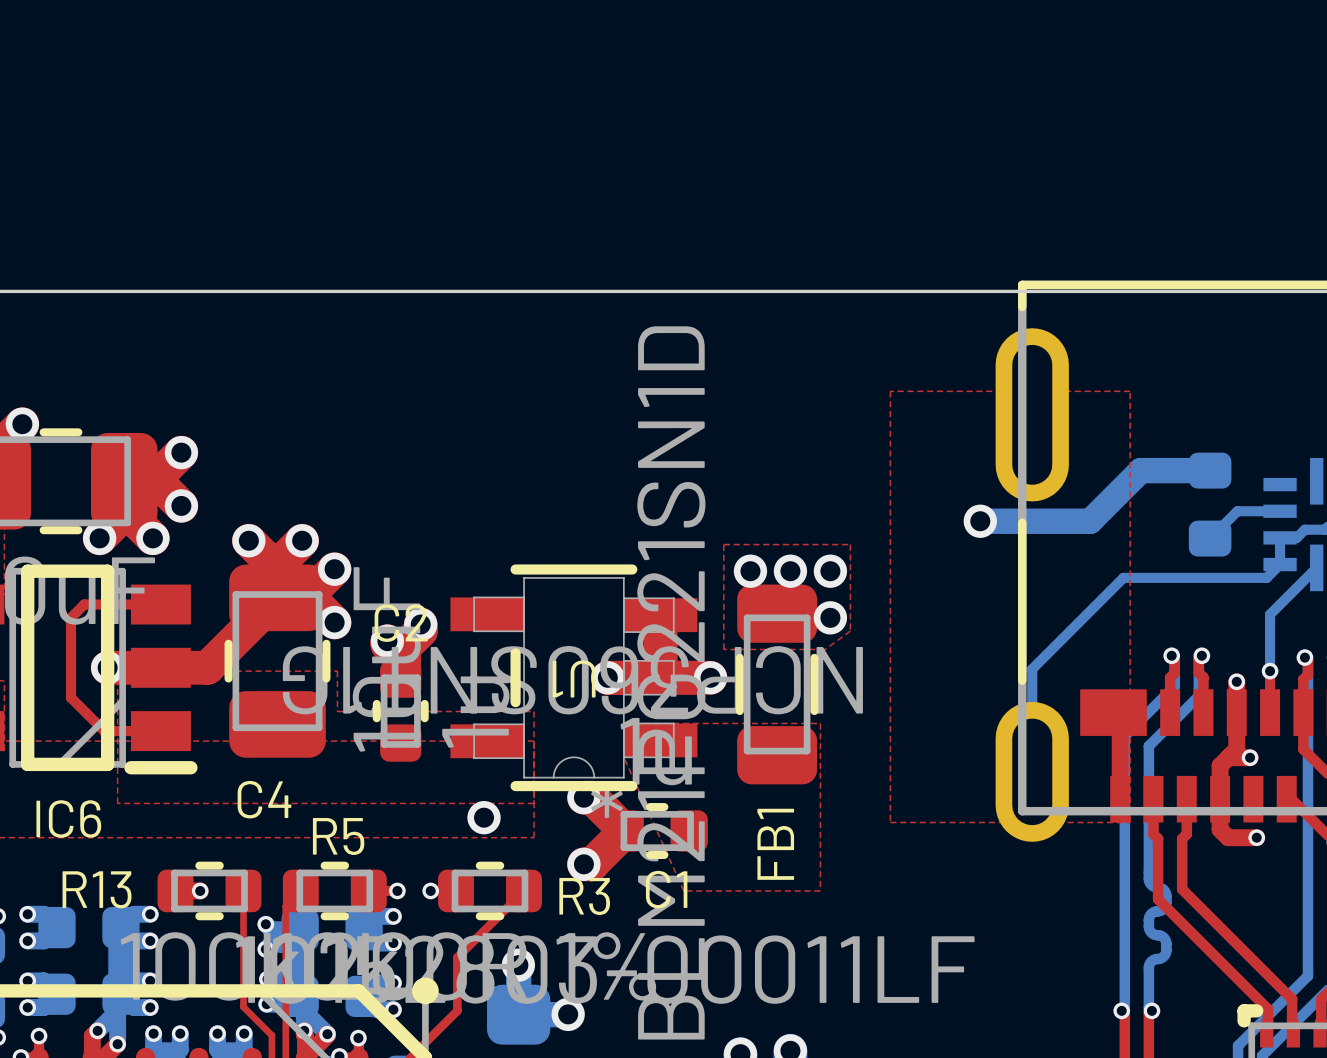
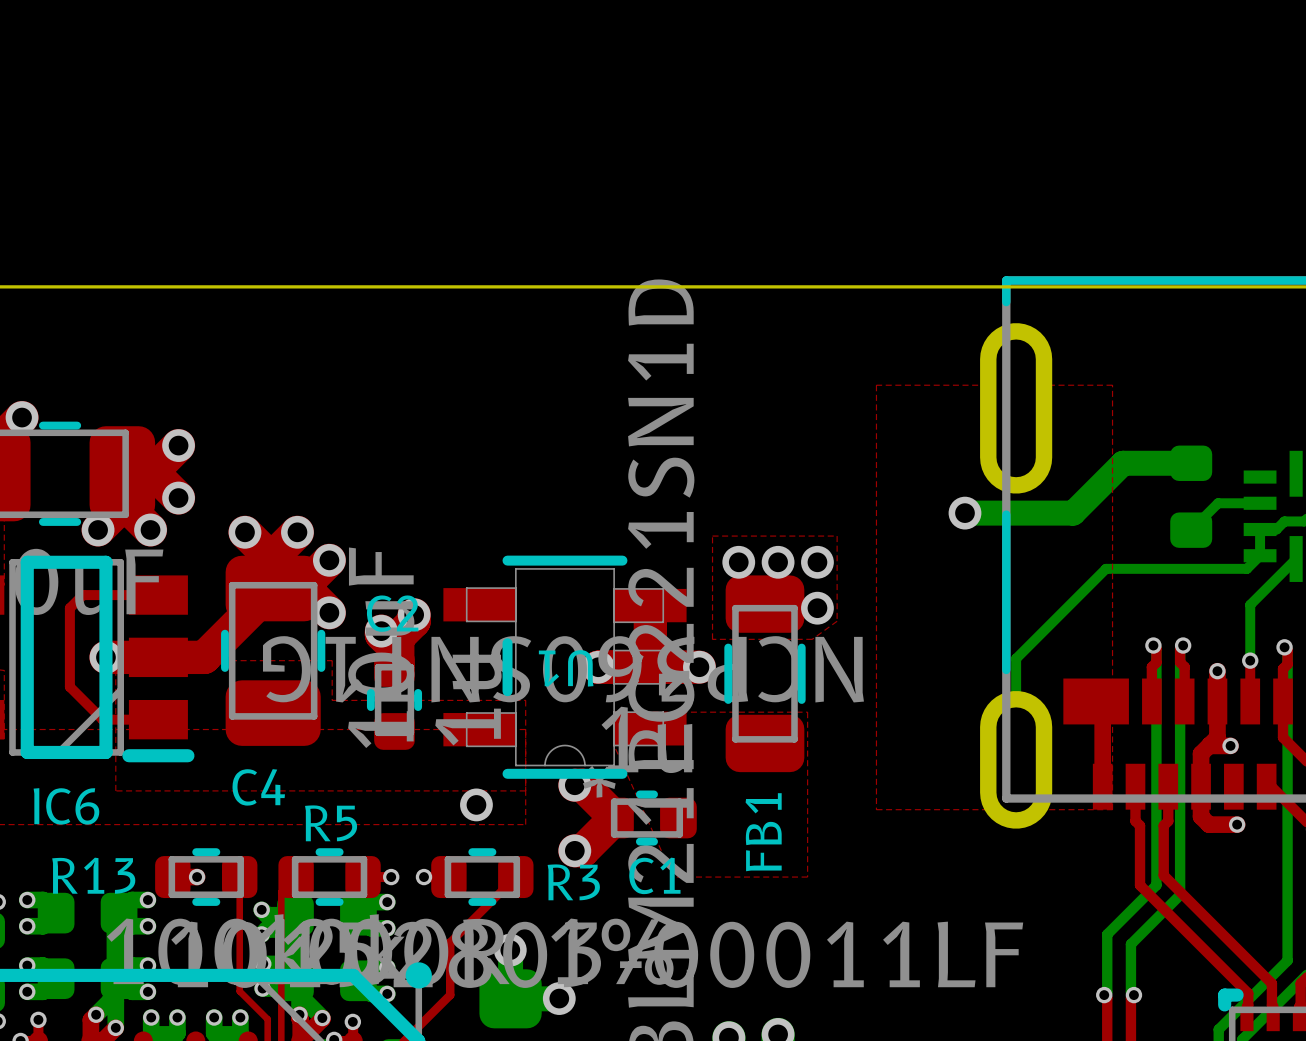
bottom track: (1174, 686) (1124, 736) (1124, 949) -> (1156, 675) (1156, 885) (1107, 934)
bottom track: (1198, 696) (1148, 746) (1148, 879) (1152, 886) (1163, 890) (1166, 896) (1164, 908) (1152, 913) (1148, 920) (1150, 931) (1162, 936) (1165, 940) (1166, 952) (1162, 957) (1151, 961) (1148, 967) -> (1180, 685) (1180, 895) (1130, 944) (1130, 952)

